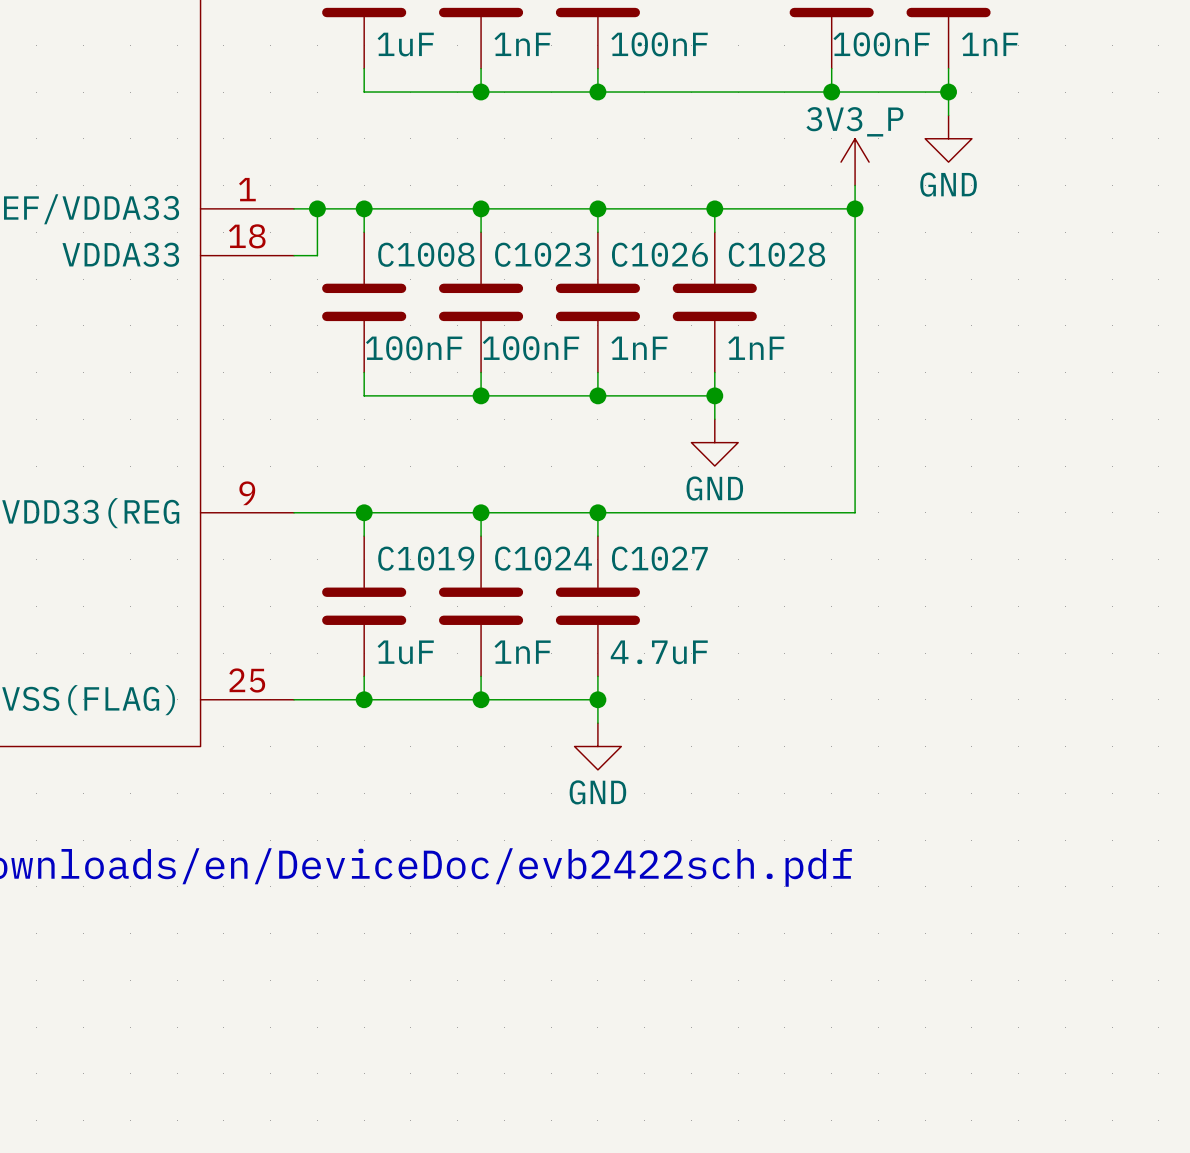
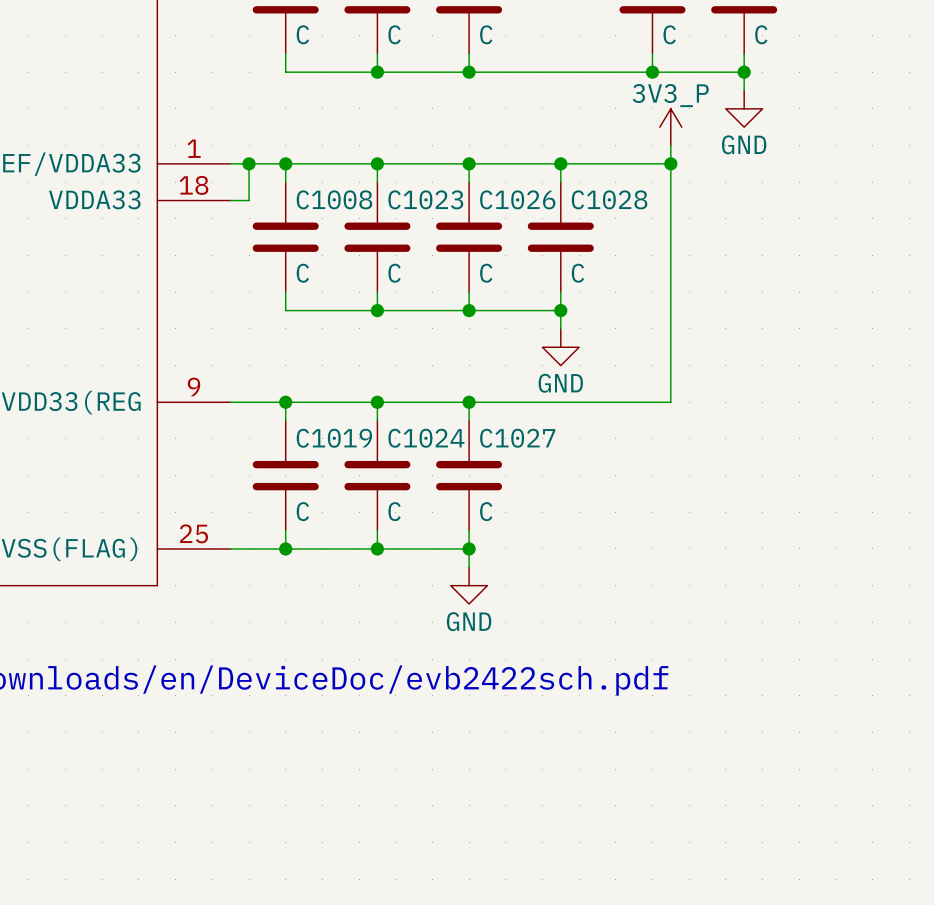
part value: 1uF (405, 44) -> C (302, 34)
part value: 1nF (522, 44) -> C (394, 34)
part value: 100nF (659, 44) -> C (486, 34)
part value: 100nF (881, 44) -> C (669, 34)
part value: 1nF (990, 44) -> C (761, 34)
C1008 value: 100nF (414, 348) -> C (302, 273)
C1023 value: 100nF (531, 348) -> C (394, 273)
C1026 value: 1nF (639, 348) -> C (486, 273)
C1028 value: 1nF (756, 348) -> C (577, 273)
C1019 value: 1uF (405, 652) -> C (302, 511)
C1024 value: 1nF (522, 652) -> C (394, 511)
C1027 value: 4.7uF (659, 652) -> C (486, 511)

